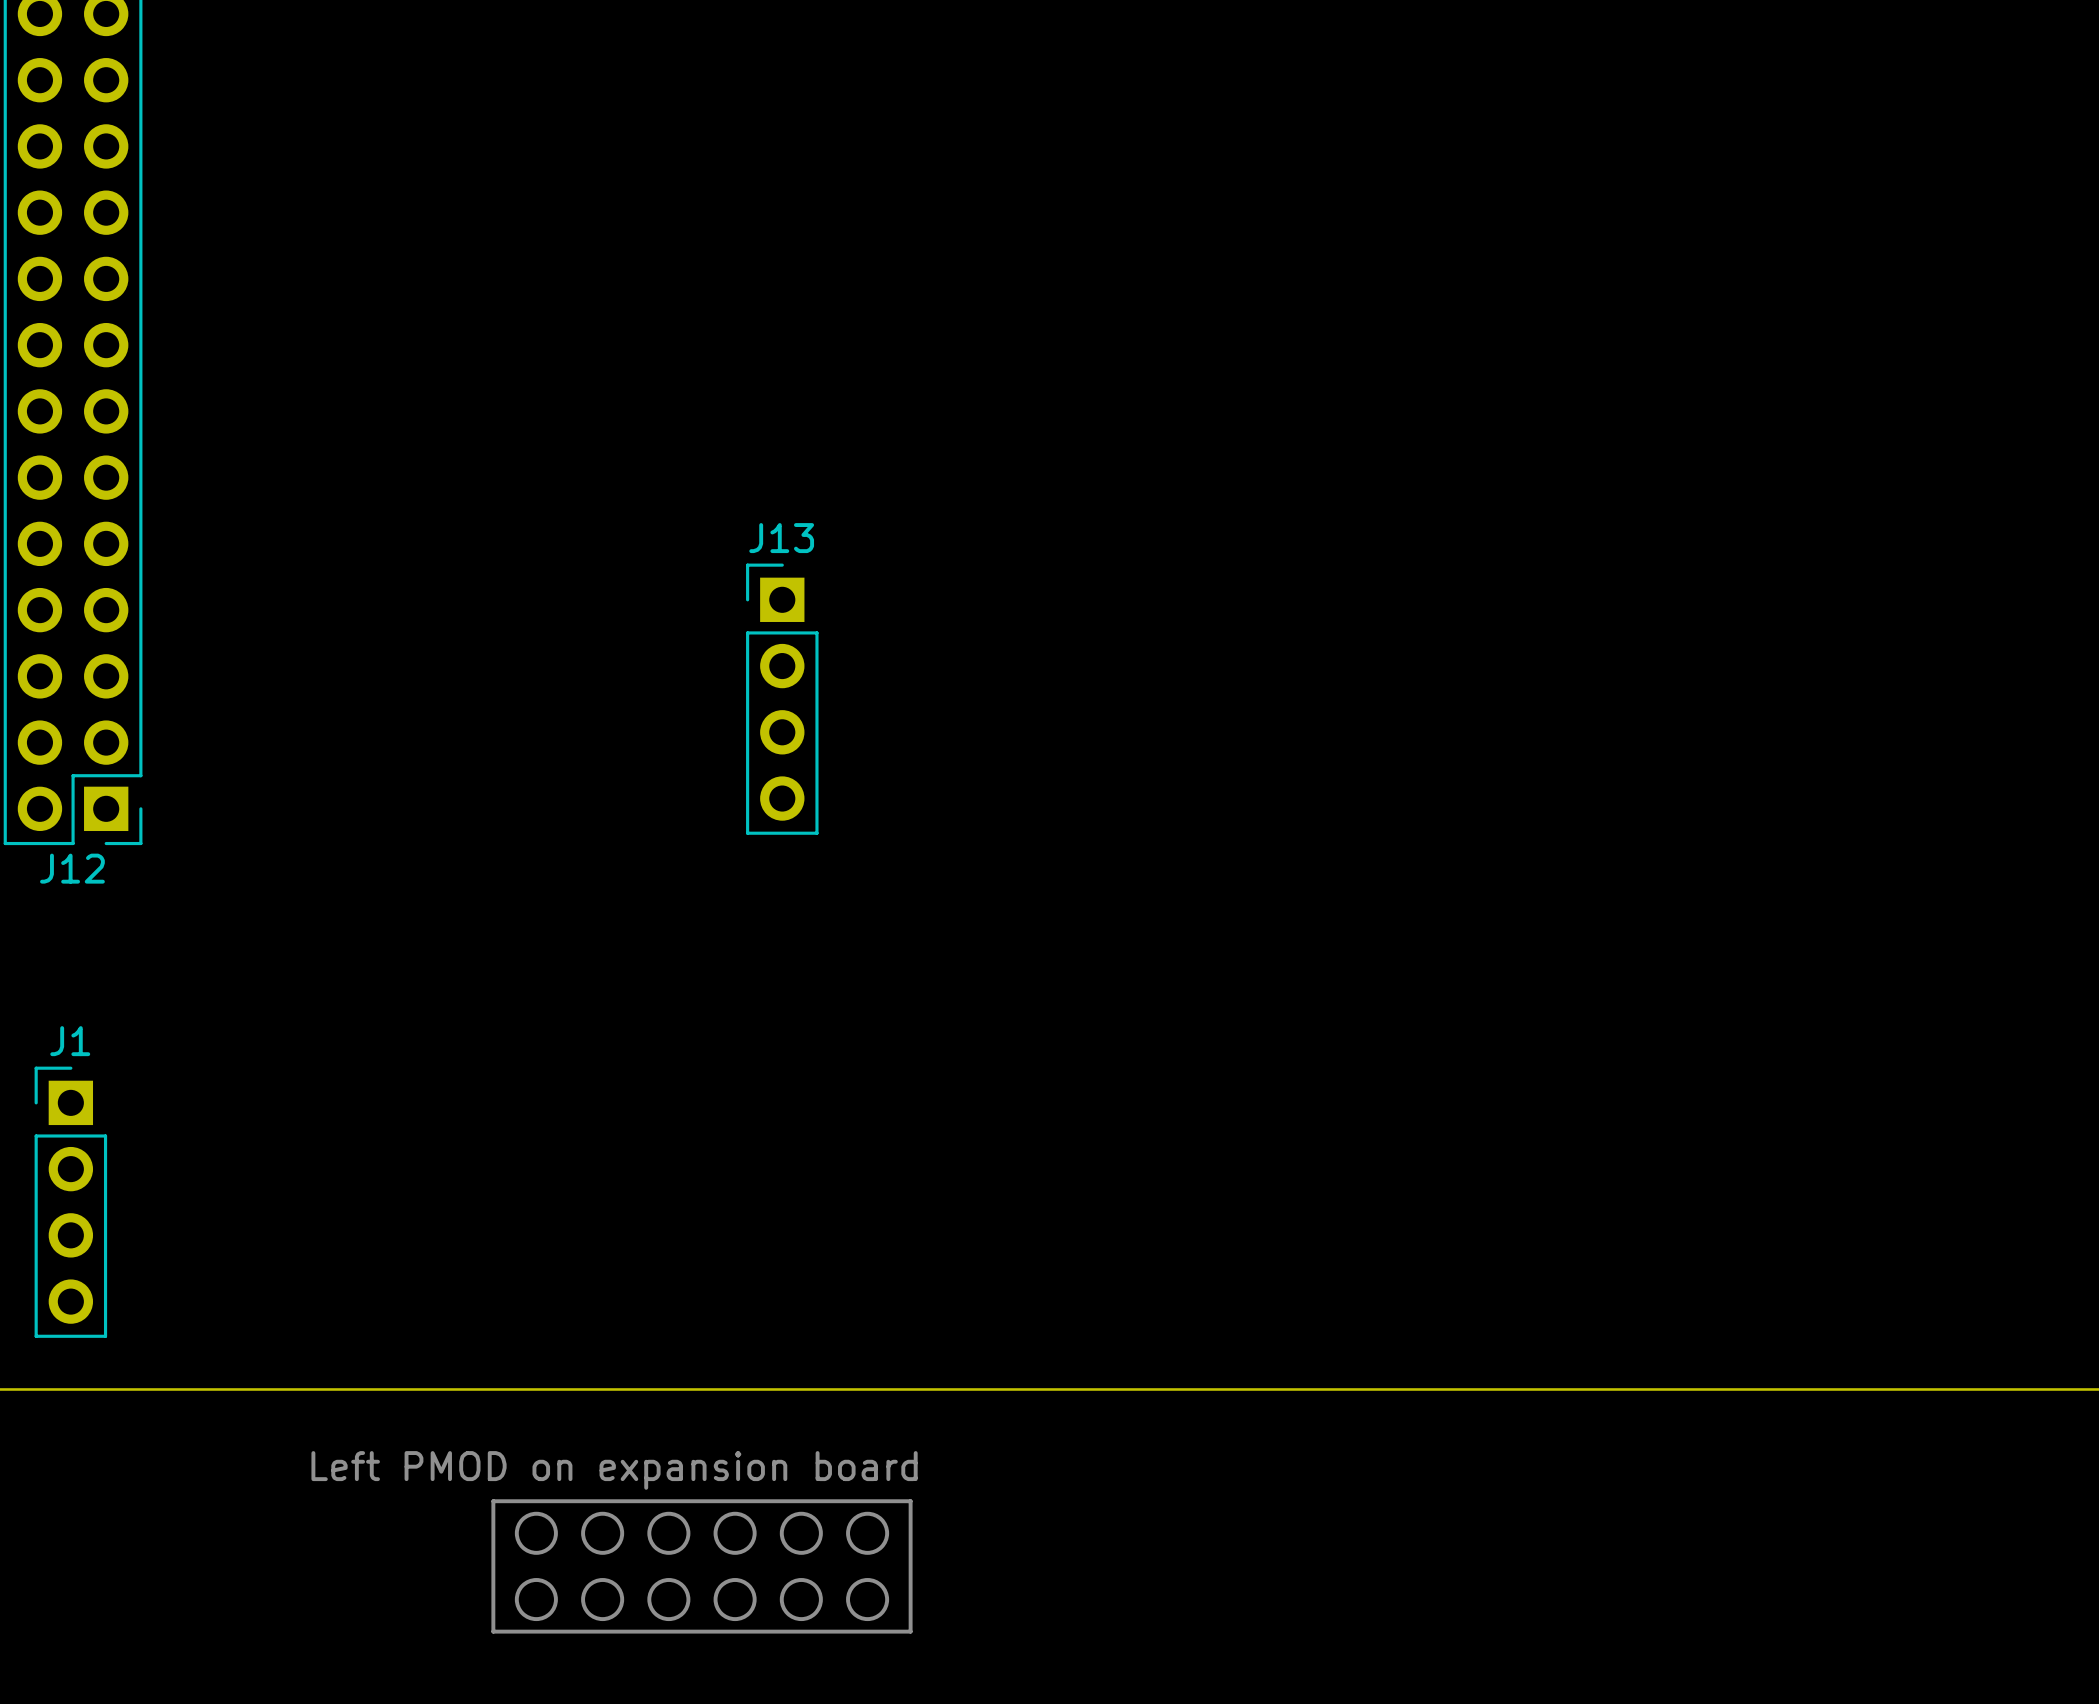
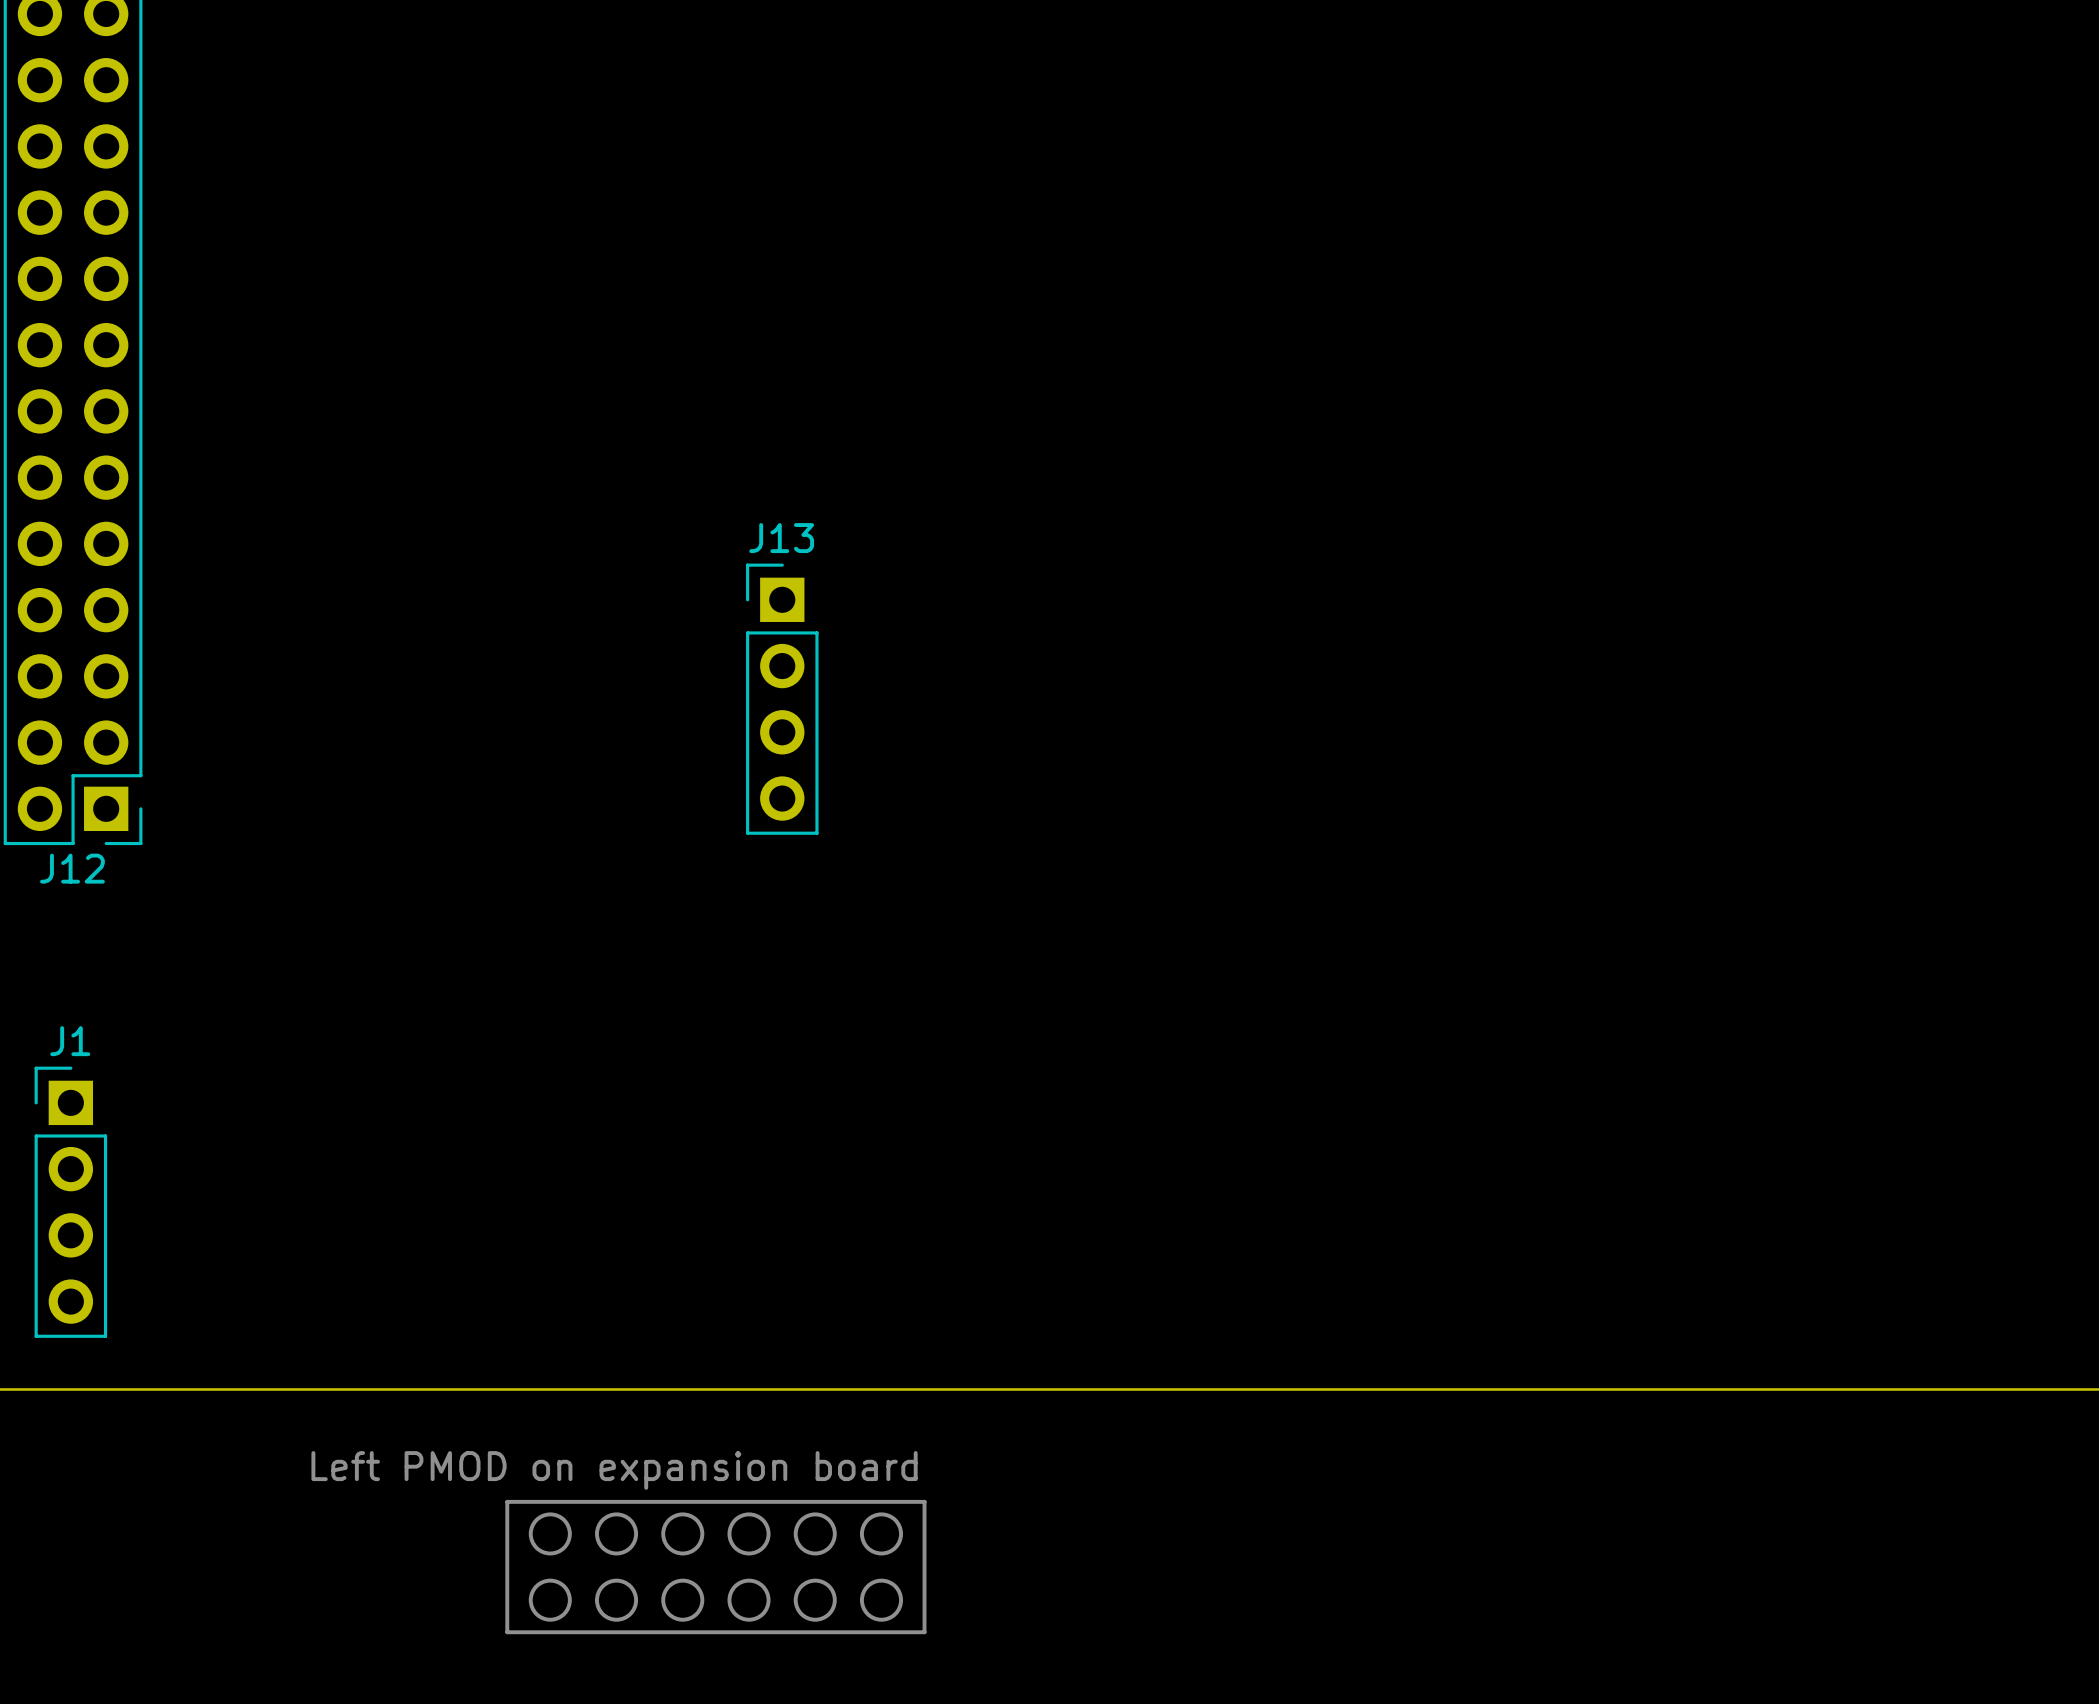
line: (493, 1501) (910, 1501) (910, 1631) (493, 1631) (493, 1501) -> (507, 1501) (924, 1501) (924, 1632) (507, 1632) (507, 1501)
drawing position: (536, 1533) -> (550, 1533)
drawing position: (602, 1533) -> (616, 1533)
drawing position: (668, 1533) -> (682, 1533)
drawing position: (735, 1533) -> (749, 1533)
drawing position: (801, 1533) -> (815, 1533)
drawing position: (867, 1533) -> (881, 1533)
drawing position: (536, 1599) -> (550, 1600)
drawing position: (602, 1599) -> (616, 1600)
drawing position: (668, 1599) -> (682, 1600)
drawing position: (735, 1599) -> (749, 1600)
drawing position: (801, 1599) -> (815, 1600)
drawing position: (867, 1599) -> (881, 1600)

